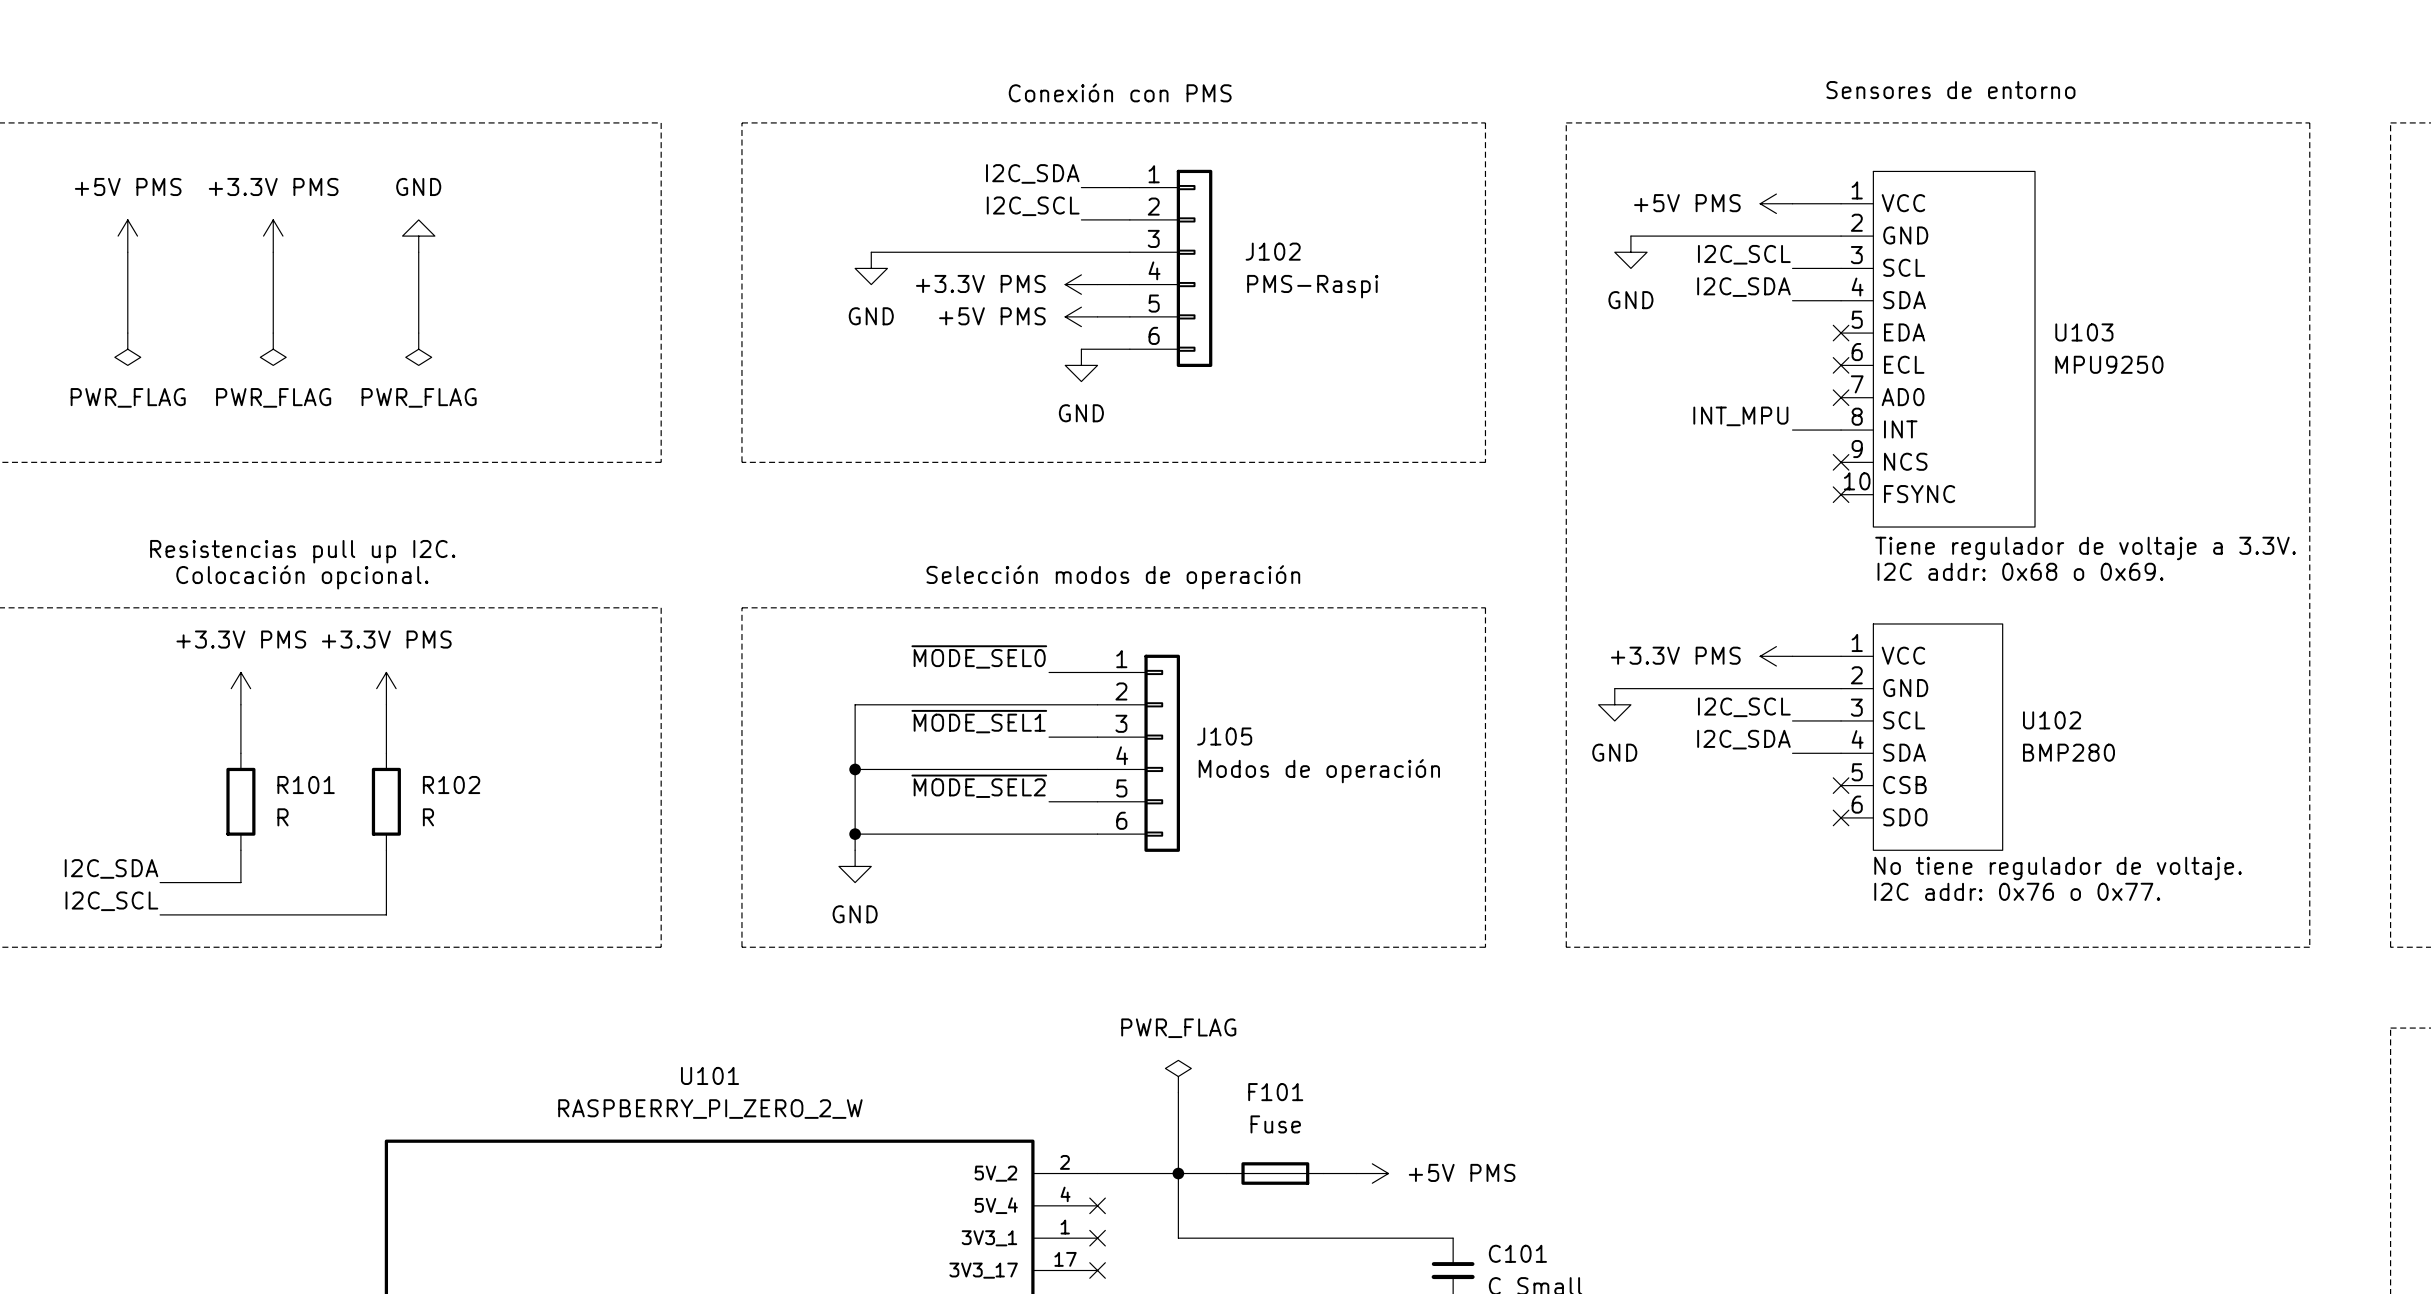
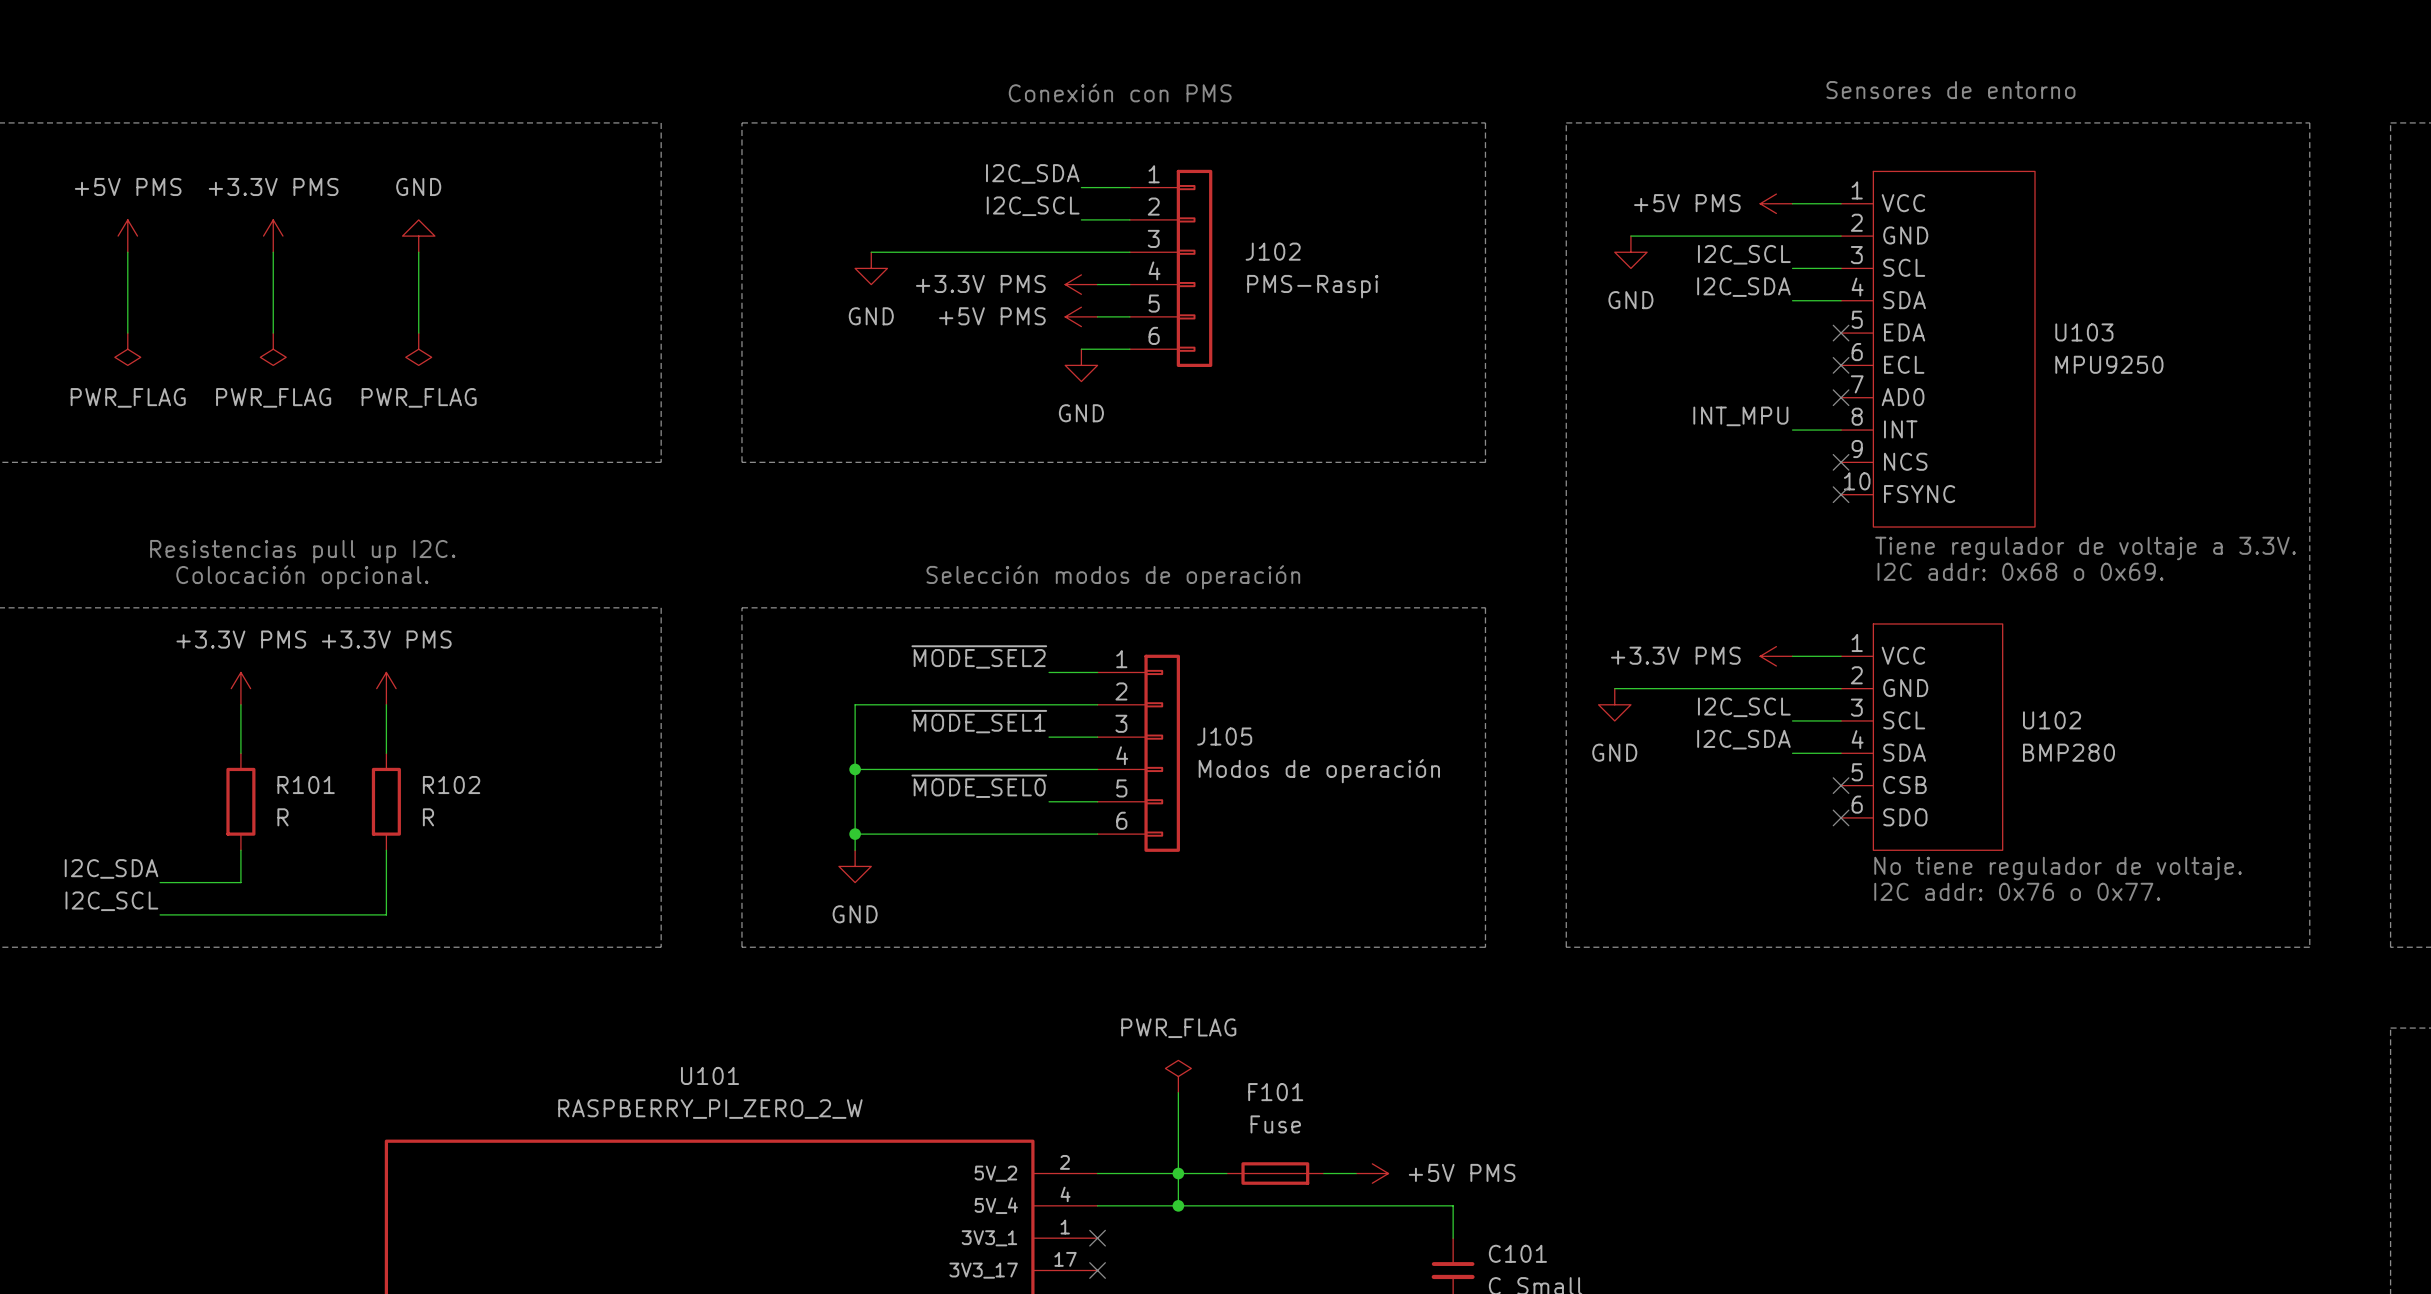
label: ~{MODE_SEL0} (979, 656) -> ~{MODE_SEL2} (979, 656)
label: ~{MODE_SEL2} (979, 786) -> ~{MODE_SEL0} (979, 786)
no-connect mark: (1097, 1205) -> none
wire: (1178, 1205) (1178, 1238) (1453, 1238) -> (1097, 1205) (1453, 1205) (1453, 1238)
junction: none -> (1178, 1205)

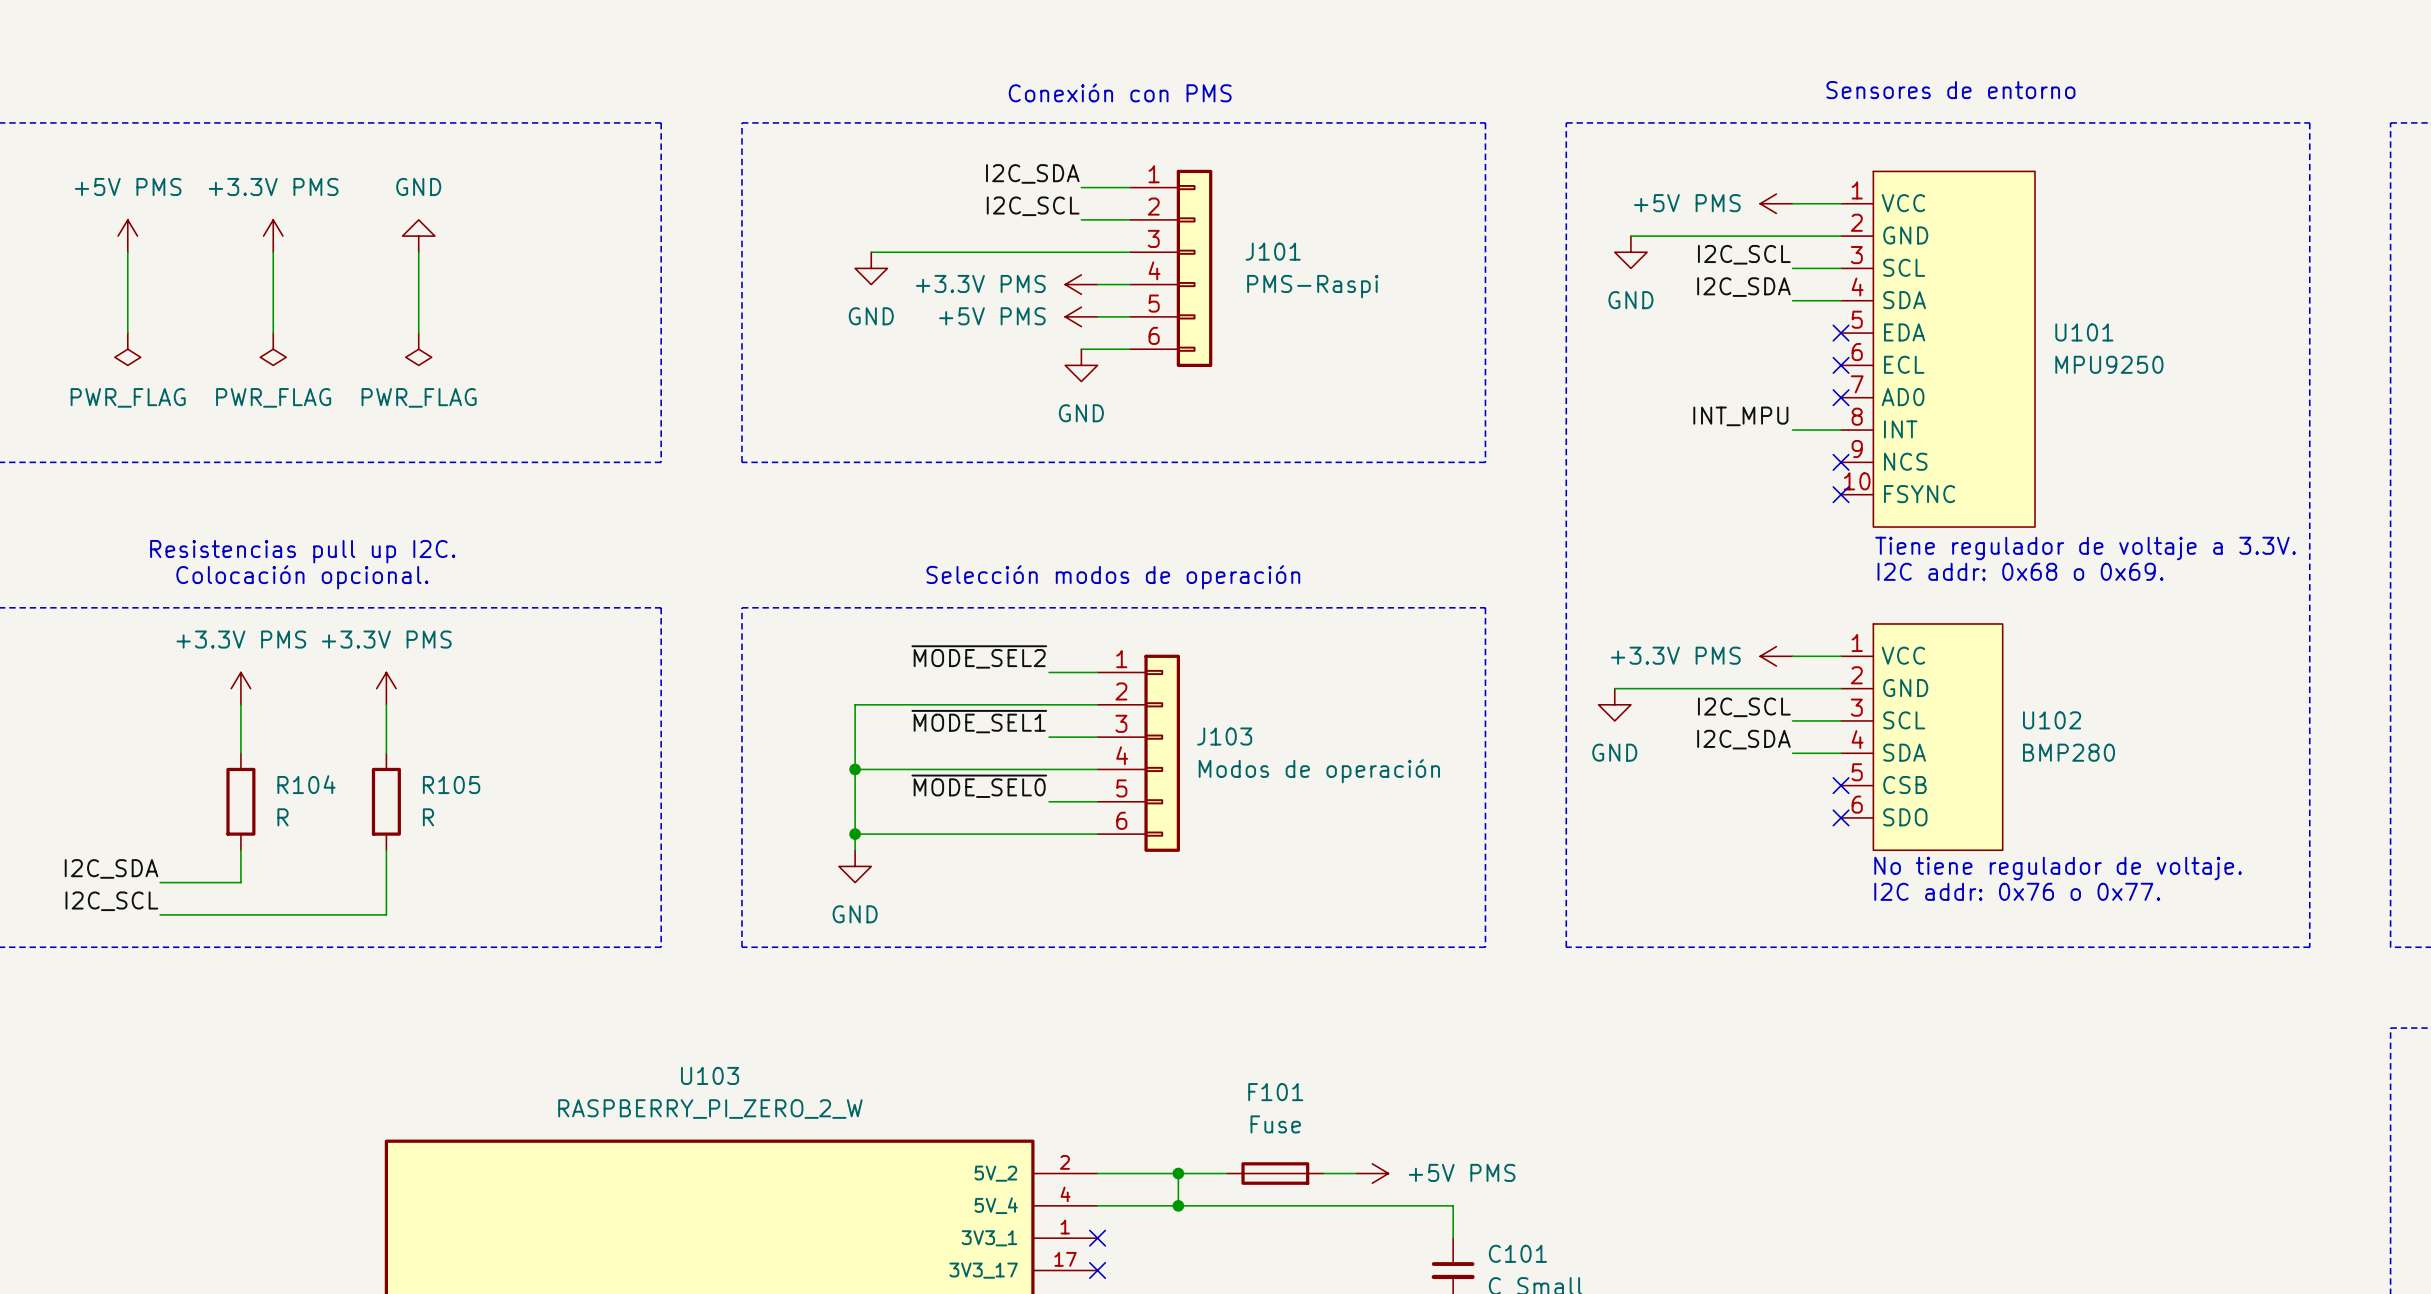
J102 name: J102 (1273, 251) -> J101 (1273, 251)
U103 name: U103 (2084, 332) -> U101 (2084, 332)
J105 name: J105 (1224, 736) -> J103 (1224, 736)
R101 name: R101 (306, 785) -> R104 (306, 784)
R102 name: R102 (451, 785) -> R105 (451, 785)
U101 name: U101 (710, 1075) -> U103 (710, 1075)
power symbol: PWR_FLAG (1178, 1076) -> none
wire: (1178, 1092) (1178, 1173) -> none

